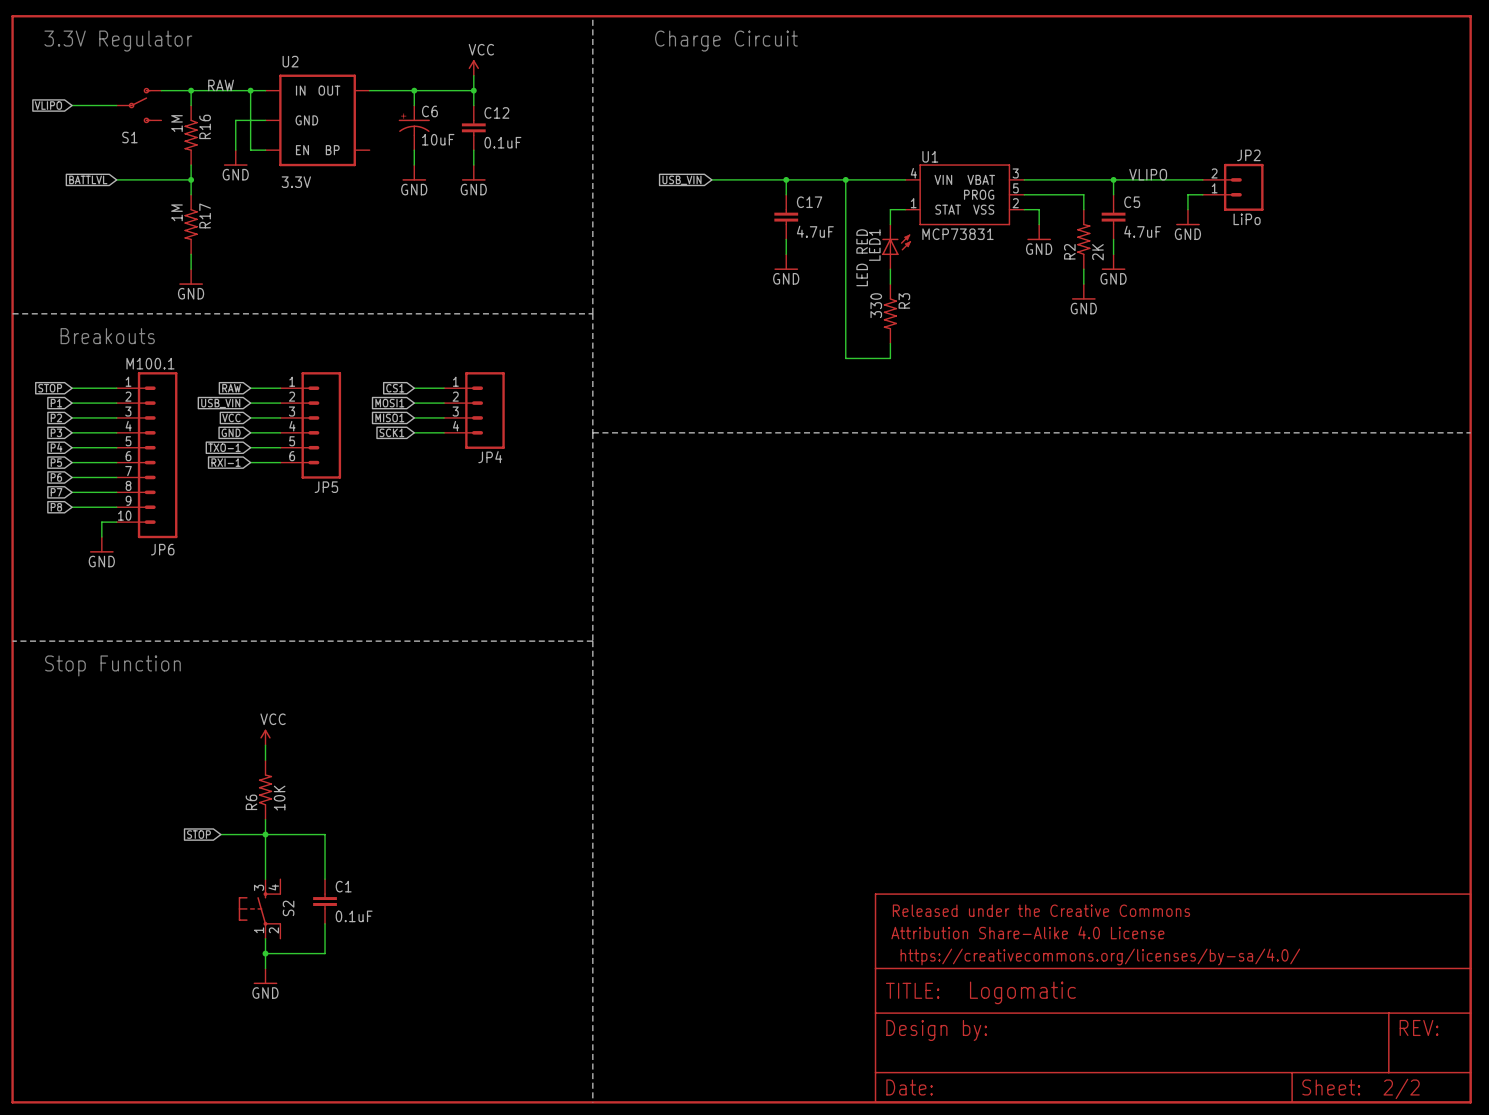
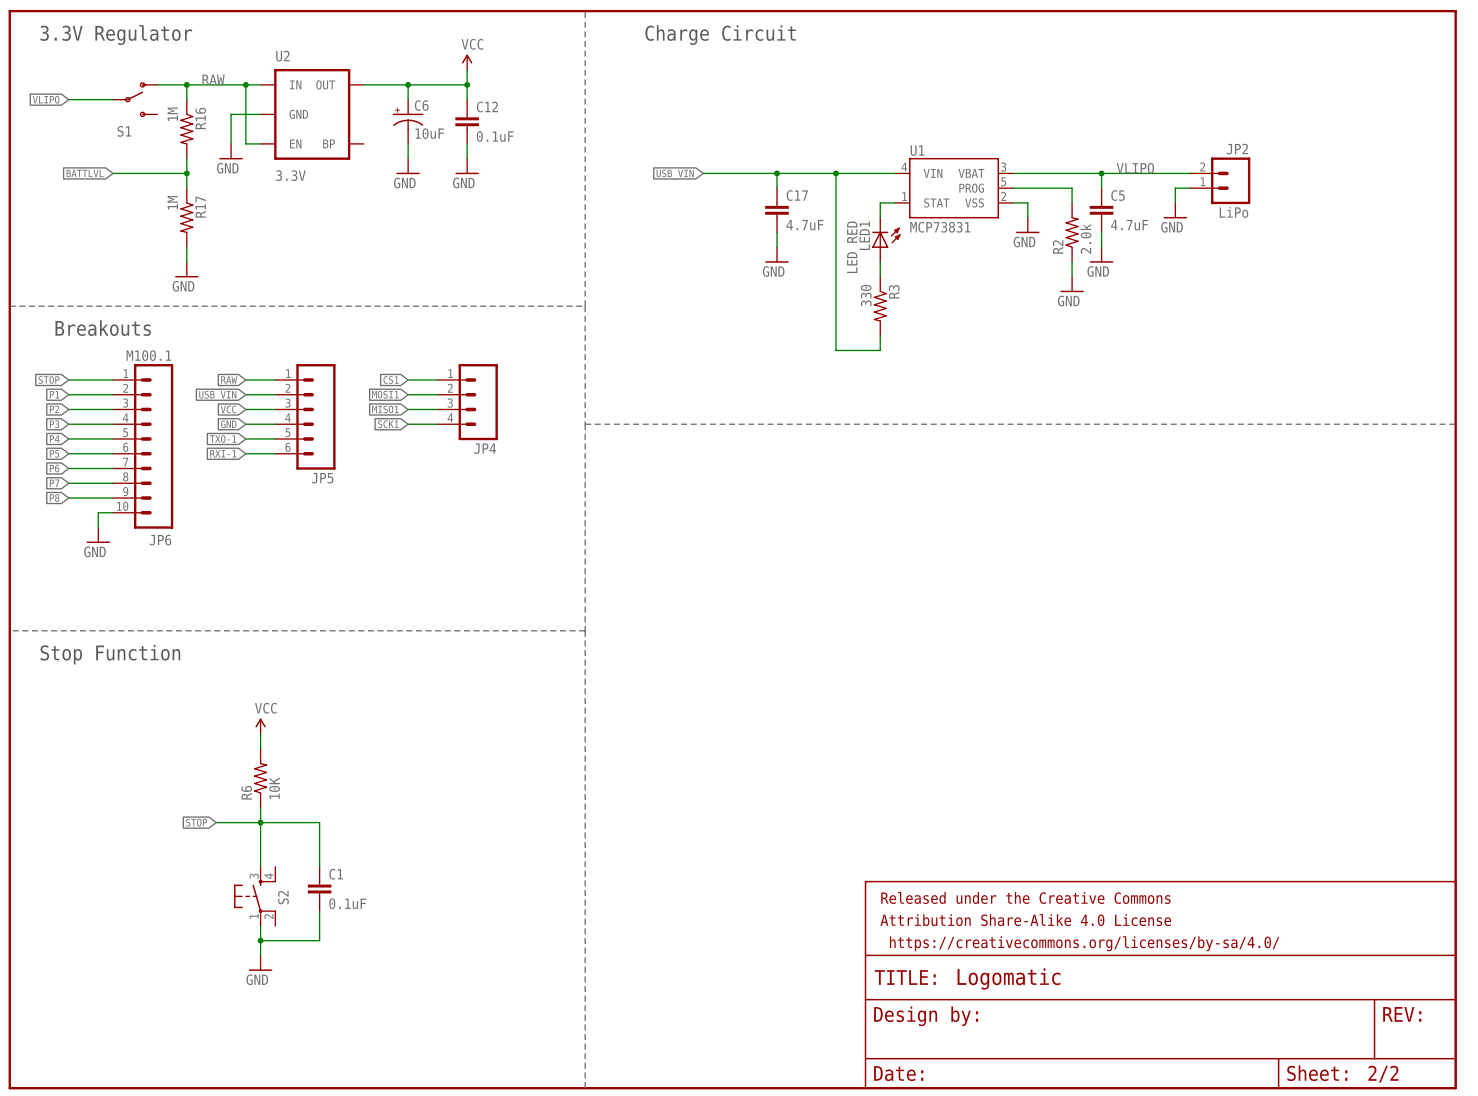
R2 value: 2K (1097, 252) -> 2.0k (1085, 238)

